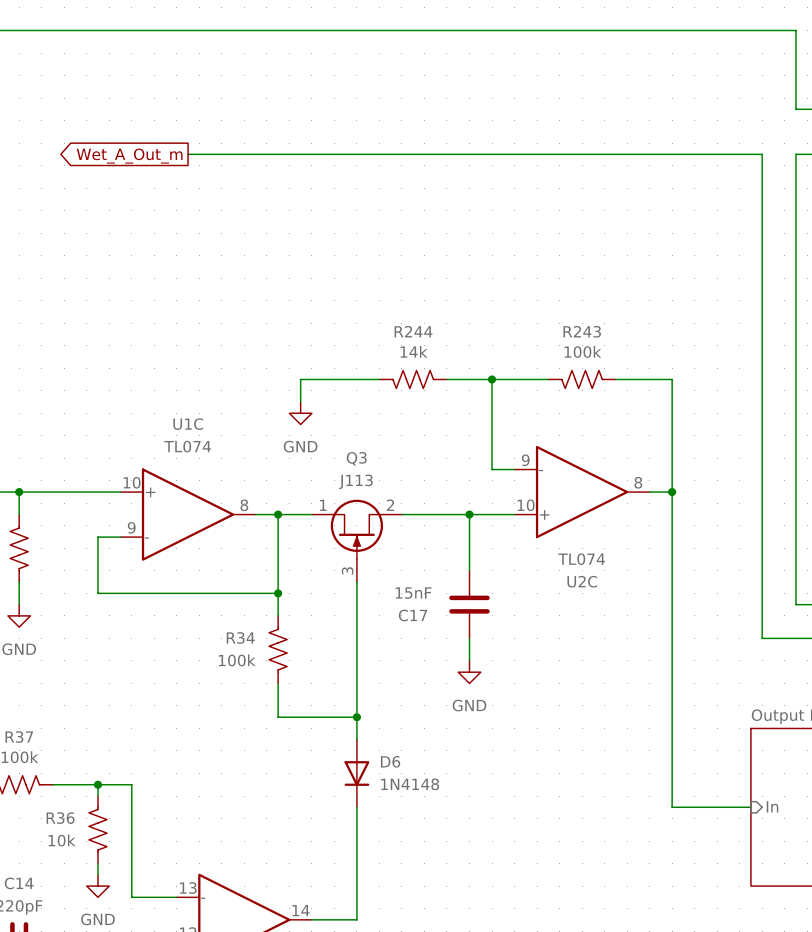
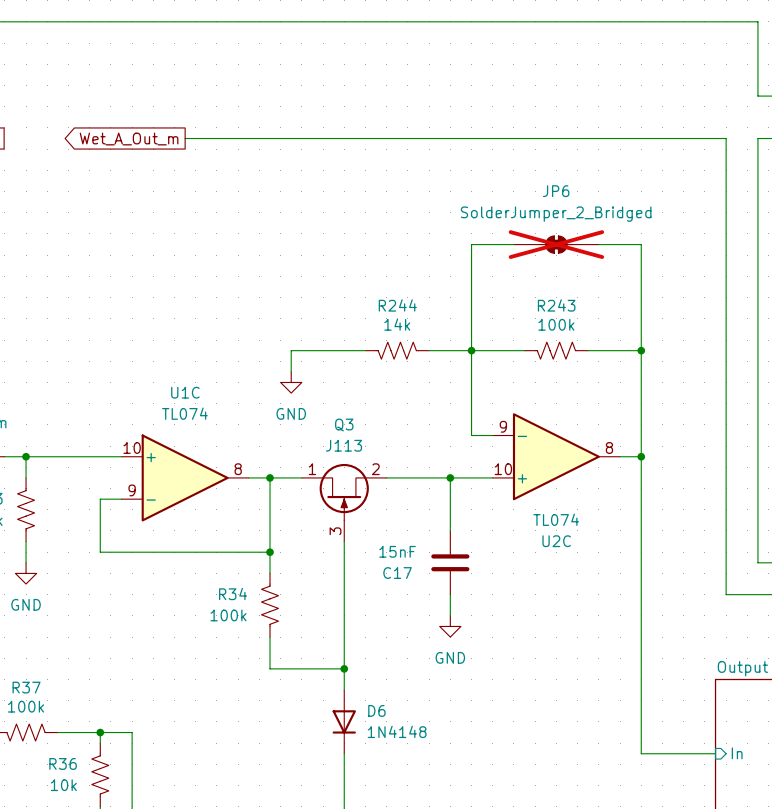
wire: none -> (513, 244) (471, 244) (471, 350)
JP6: none -> SolderJumper_2_Bridged (556, 244)
wire: none -> (598, 244) (641, 244) (641, 350)
junction: none -> (641, 350)

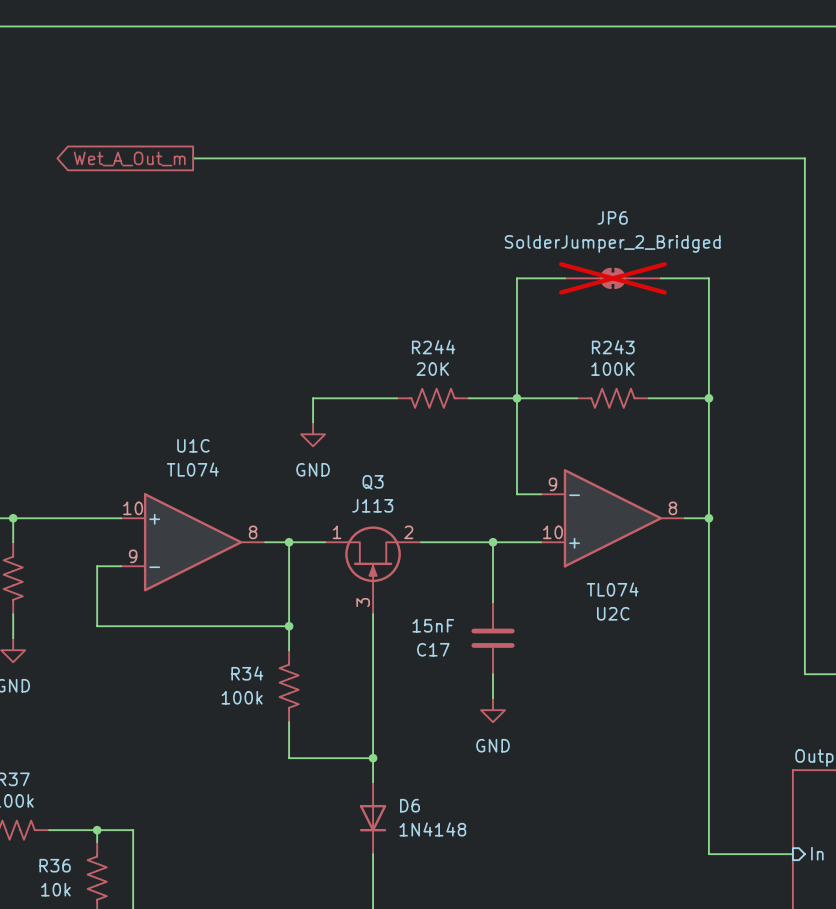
R244 value: 14k (397, 324) -> 20K (432, 369)
R243 value: 100k (556, 324) -> 100K (612, 369)

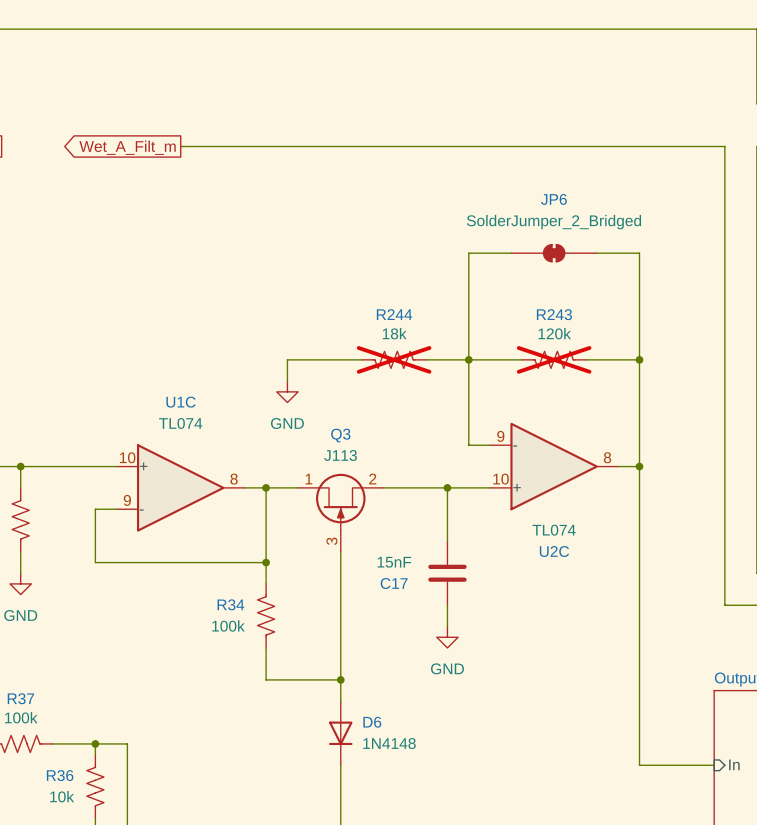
global label: Wet_A_Out_m (129, 158) -> Wet_A_Filt_m (127, 147)
JP6 do-not-place cross: (612, 278) -> none
R244 value: 20K (432, 369) -> 18k (394, 333)
R243 value: 100K (612, 369) -> 120k (554, 333)
R244 do-not-place cross: none -> (394, 359)
R243 do-not-place cross: none -> (554, 359)

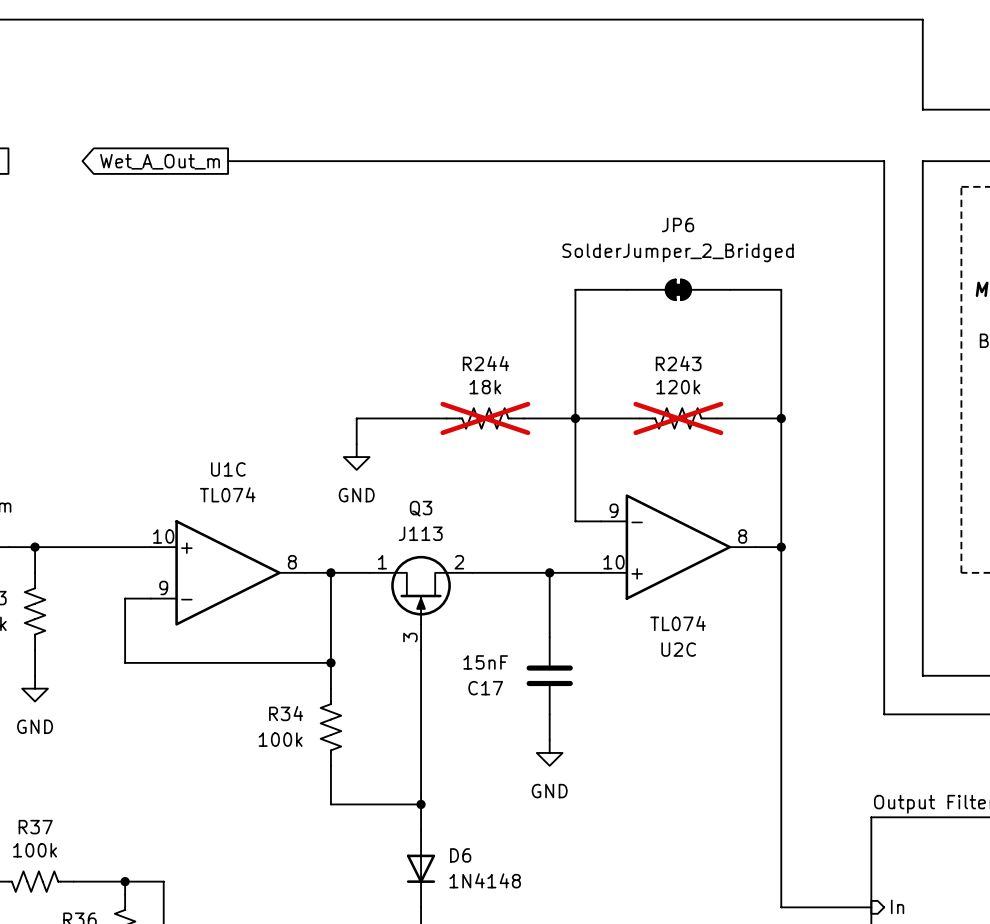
global label: Wet_A_Filt_m (127, 147) -> Wet_A_Out_m (160, 161)

